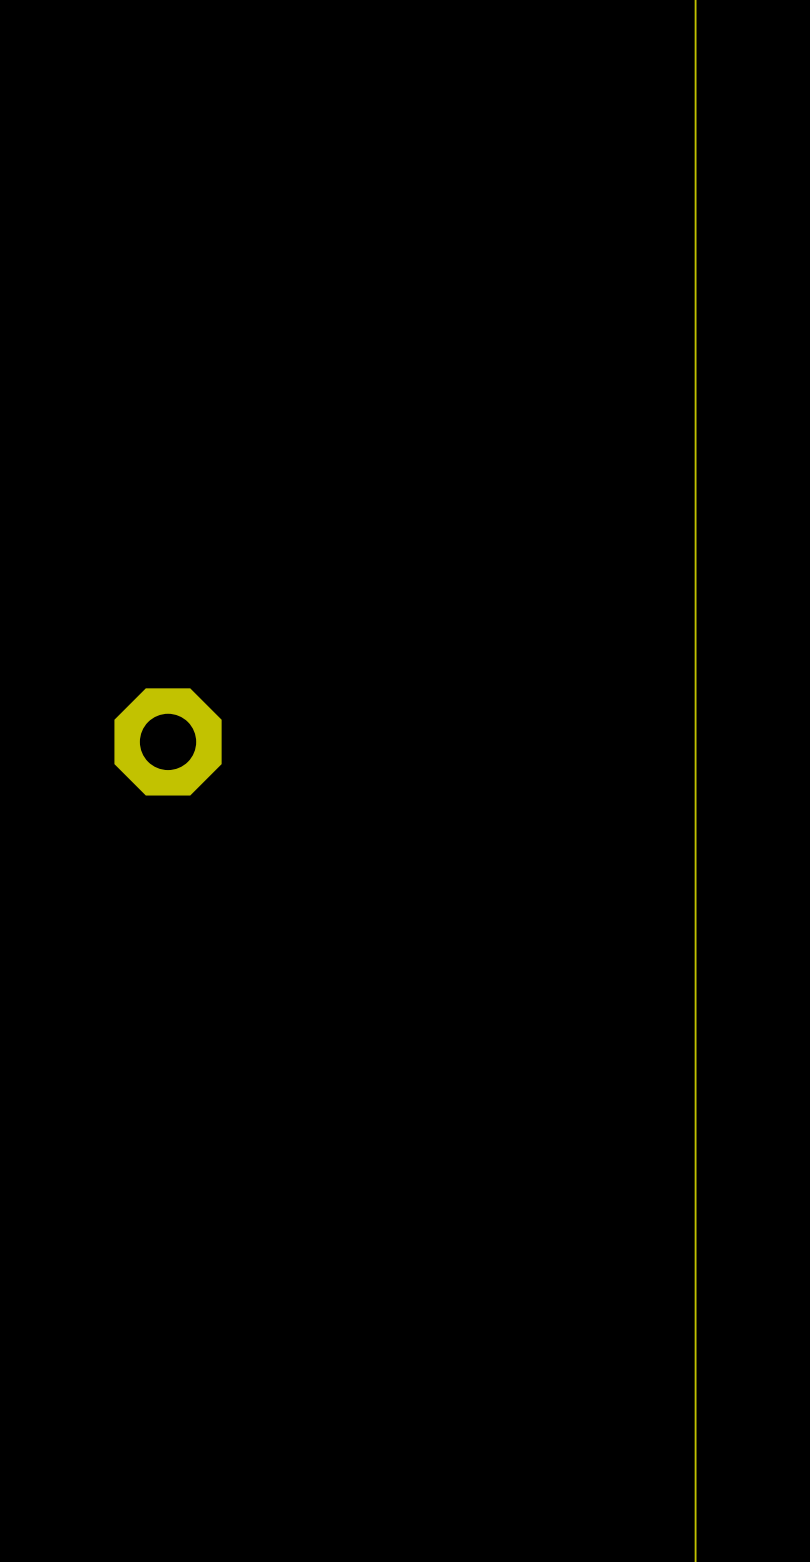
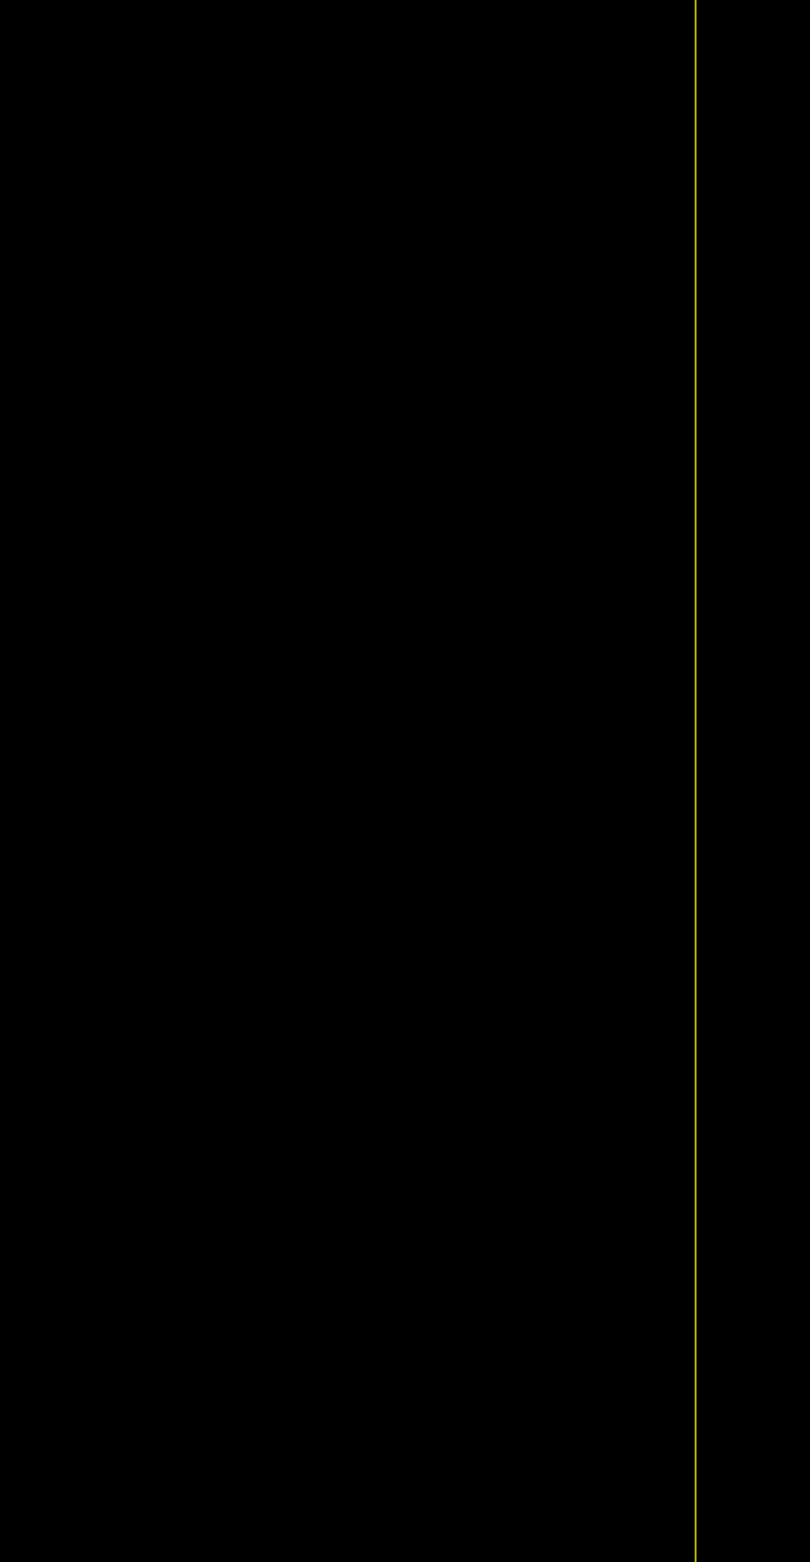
part: (168, 741) -> none

